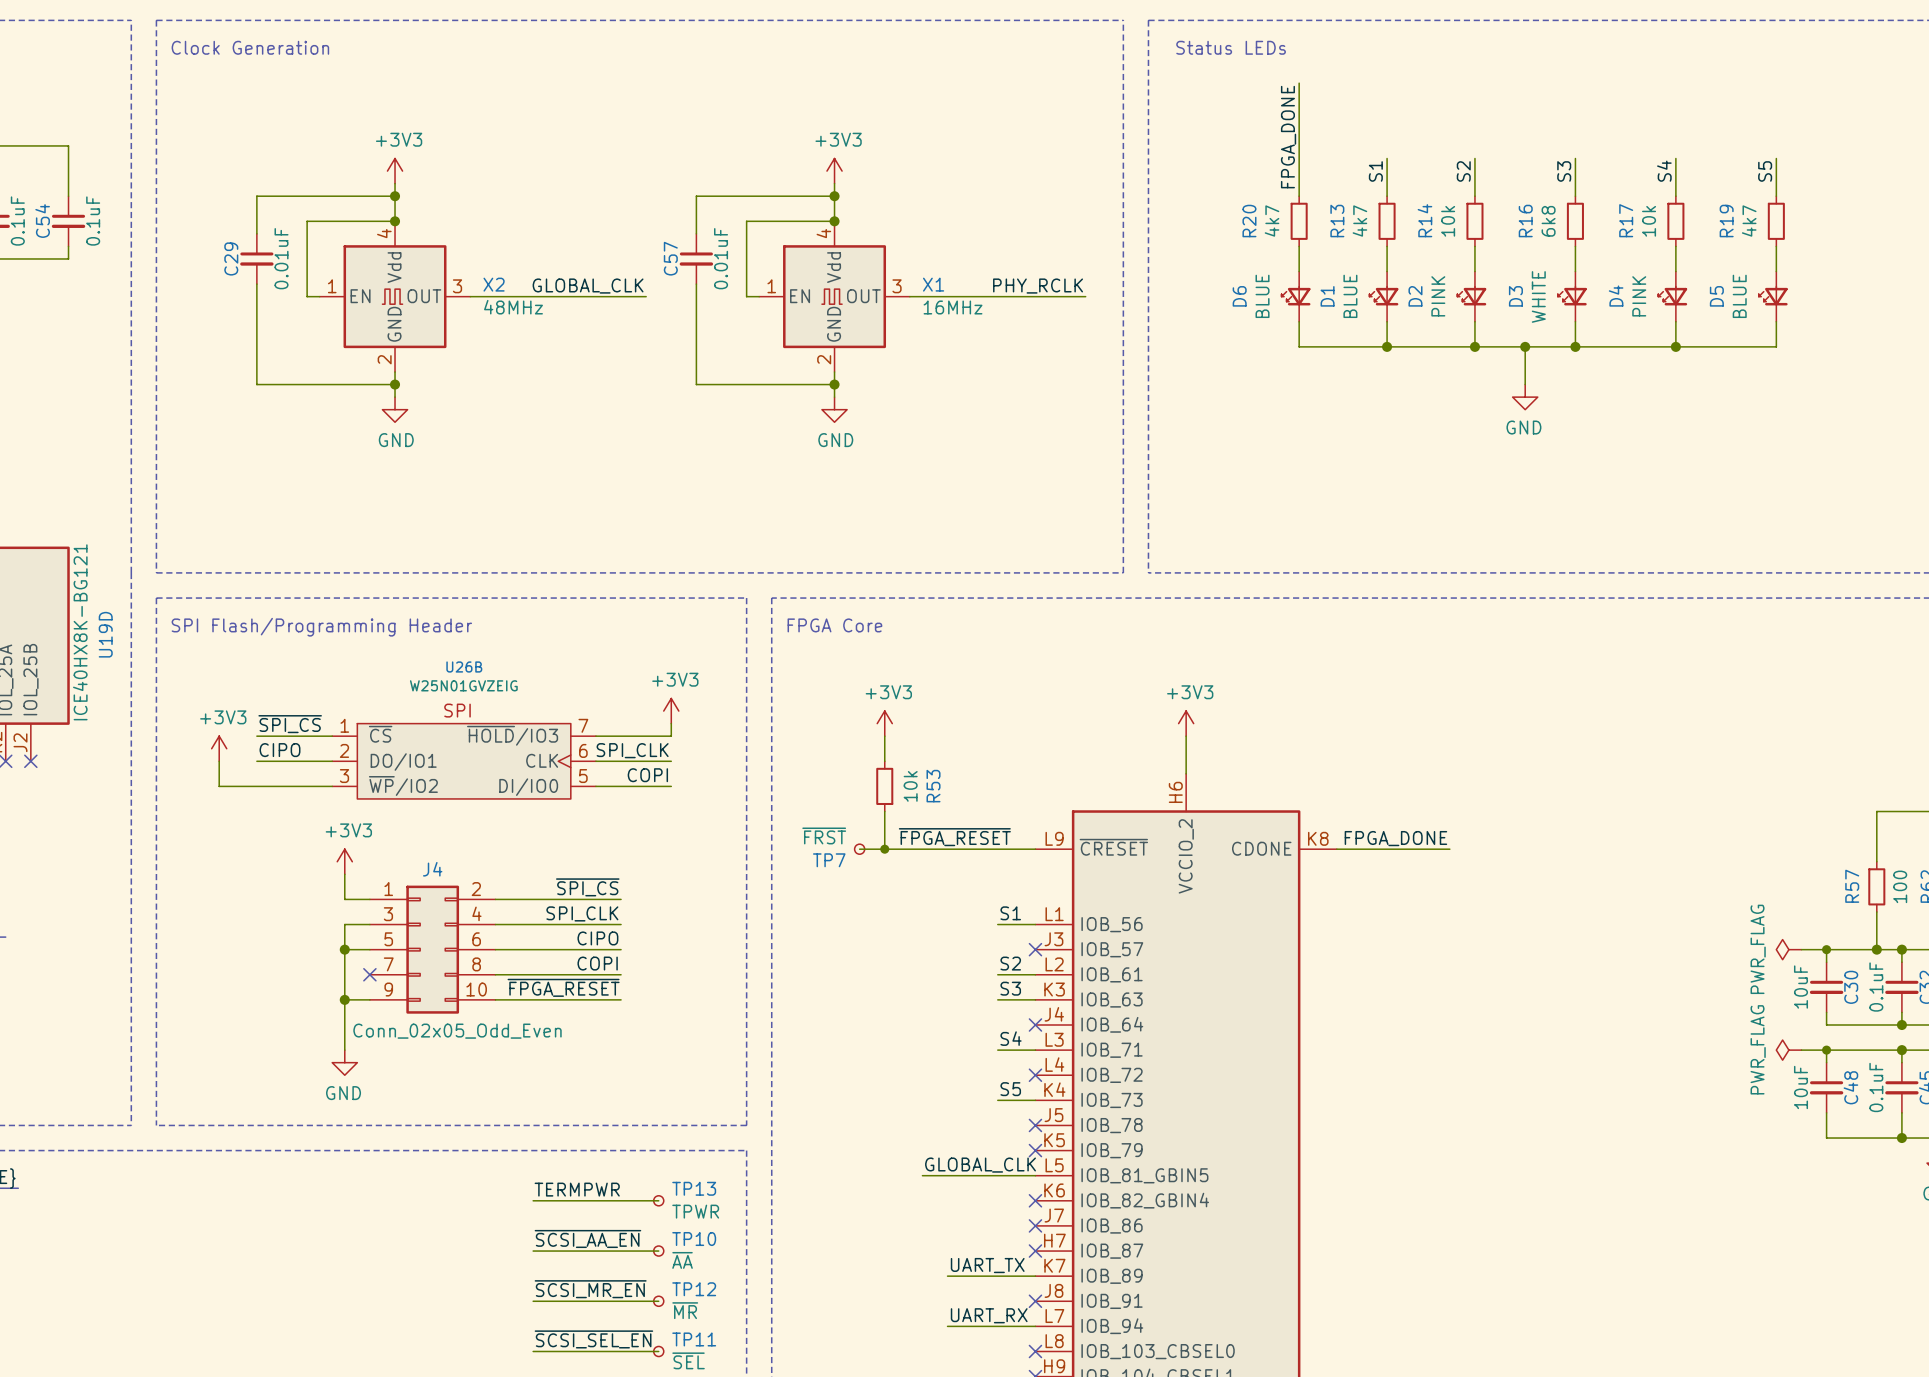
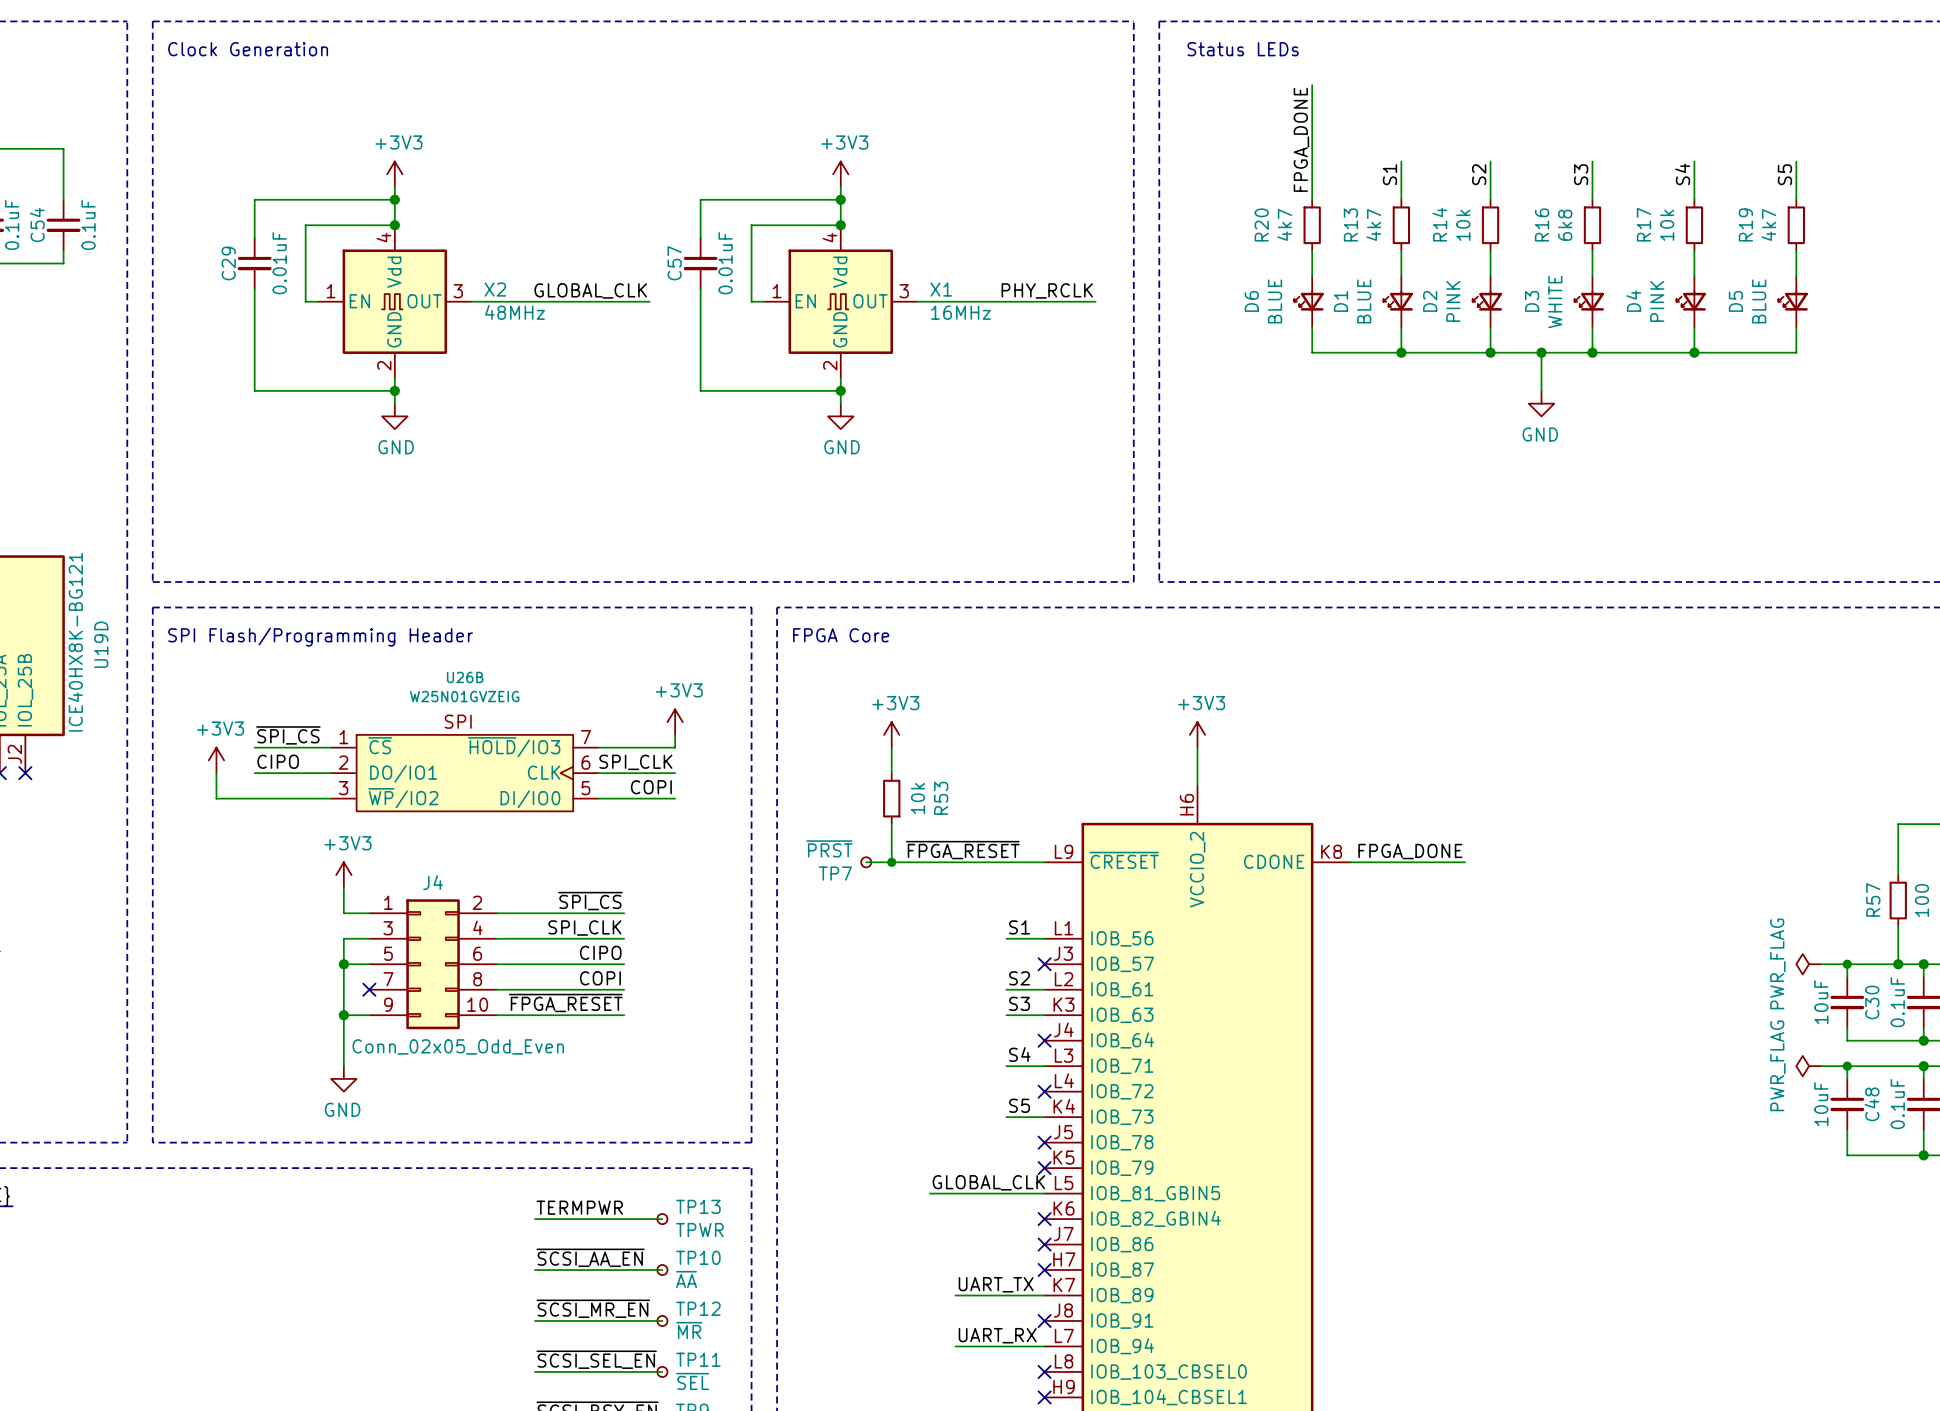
TP7 value: ~{FRST} (824, 835) -> ~{PRST} (829, 848)

